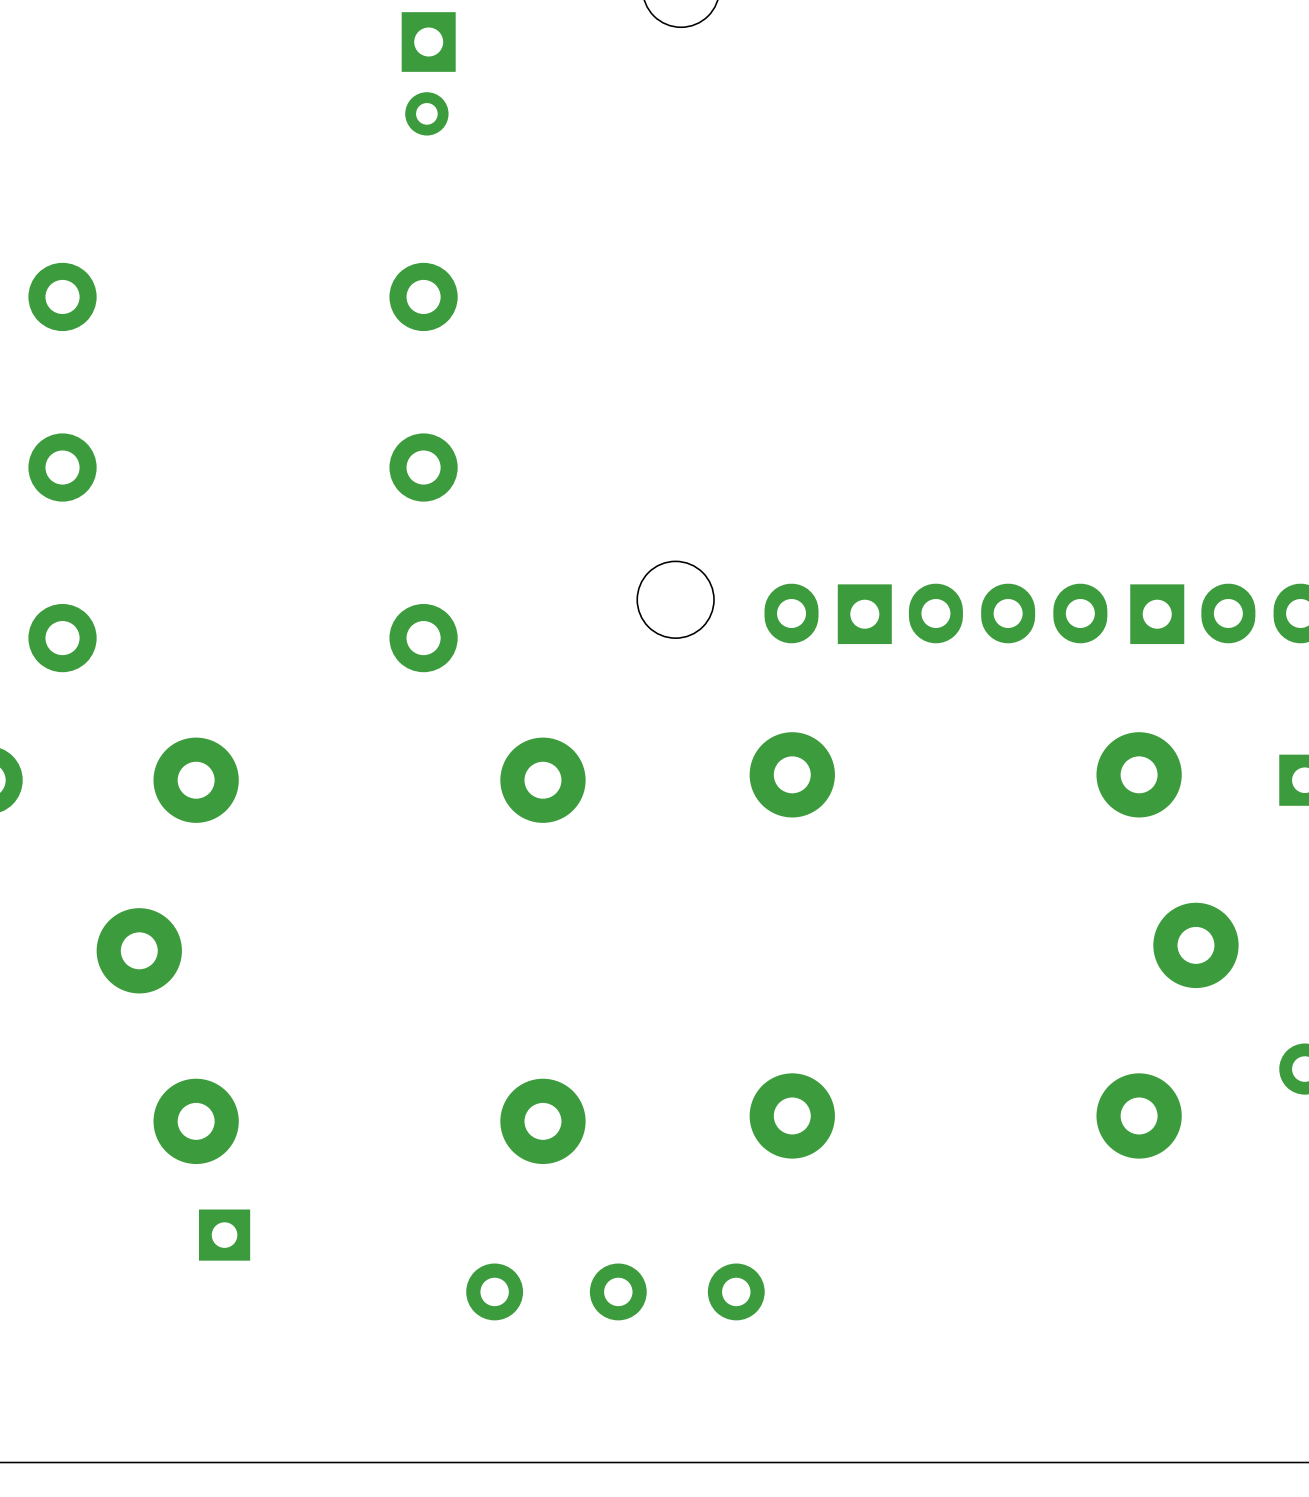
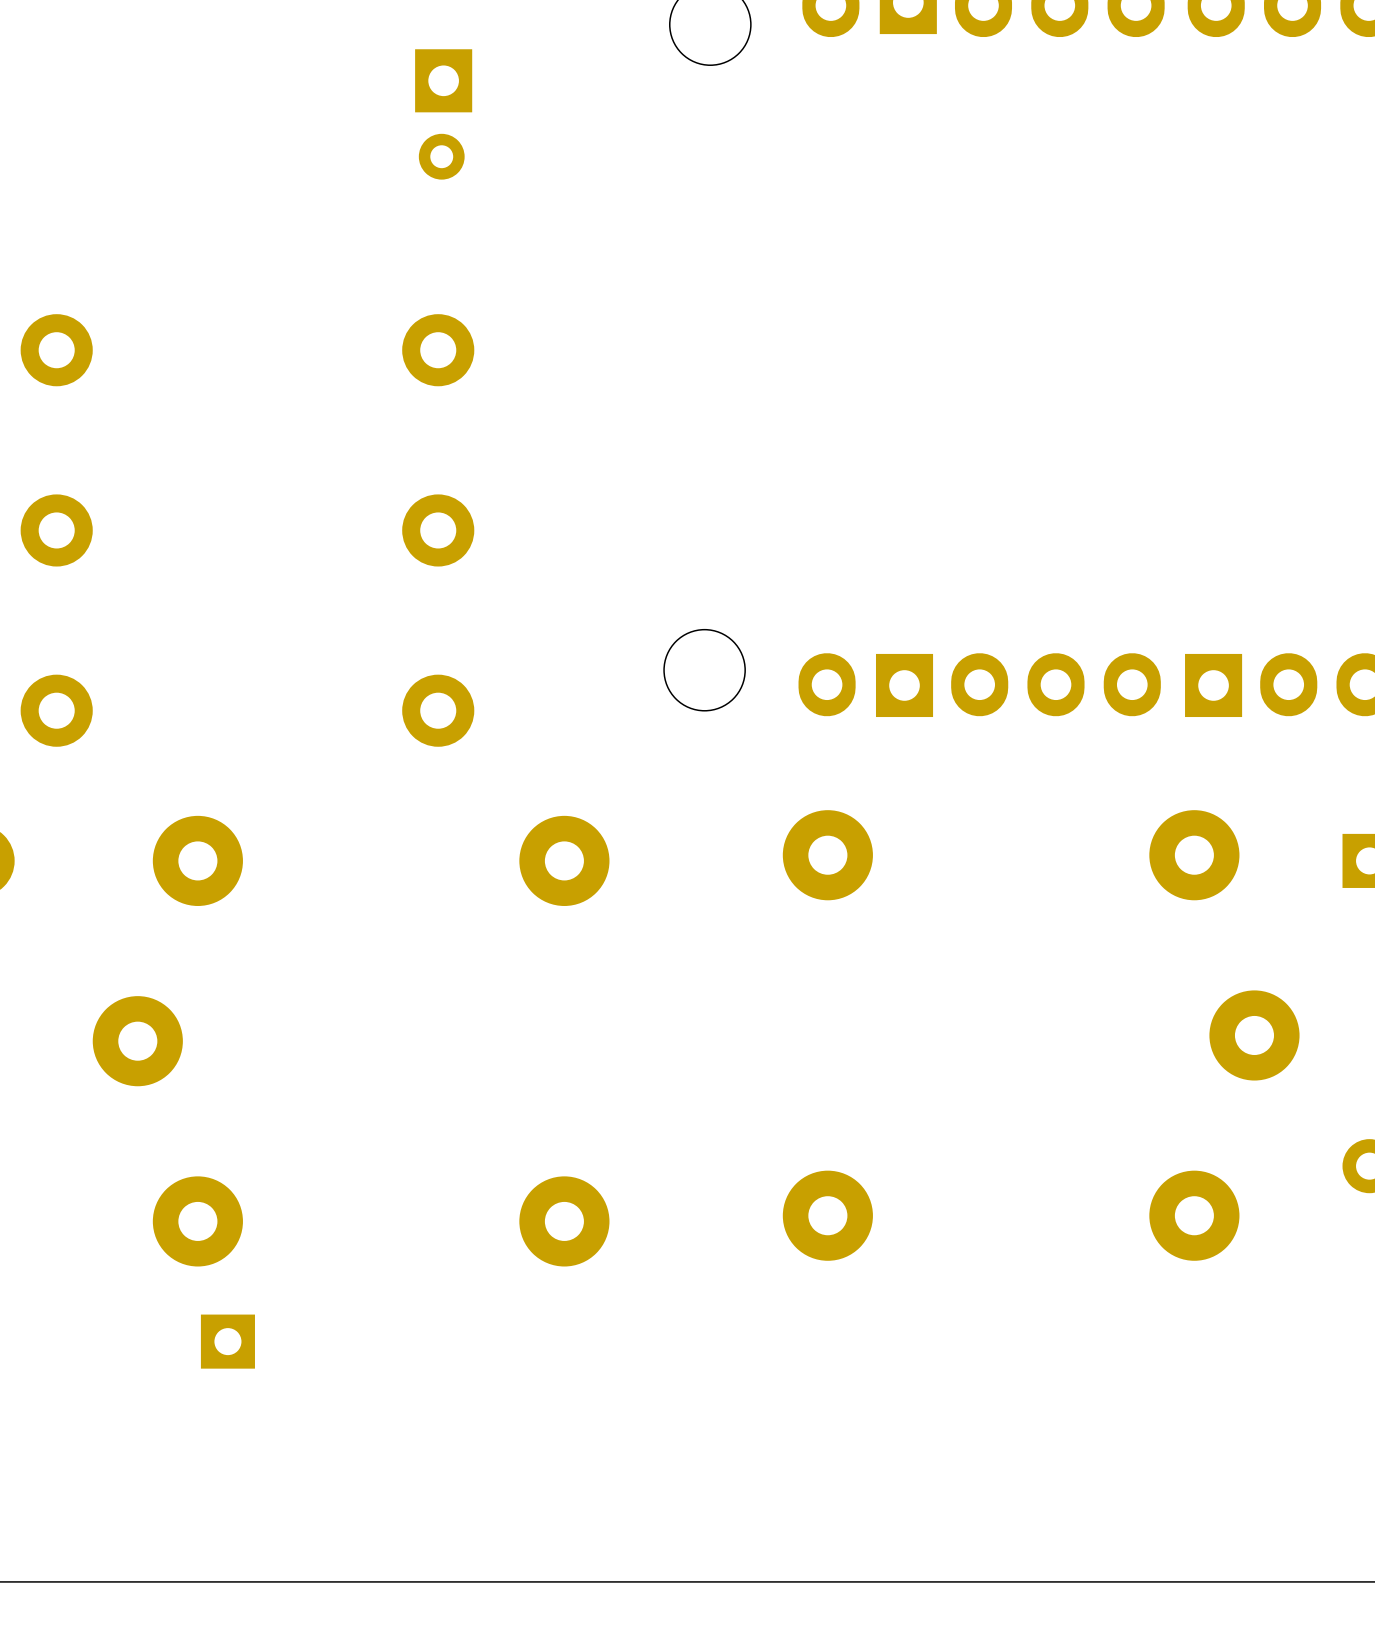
part: (494, 1291) -> none
part: (618, 1291) -> none
part: (736, 1291) -> none

